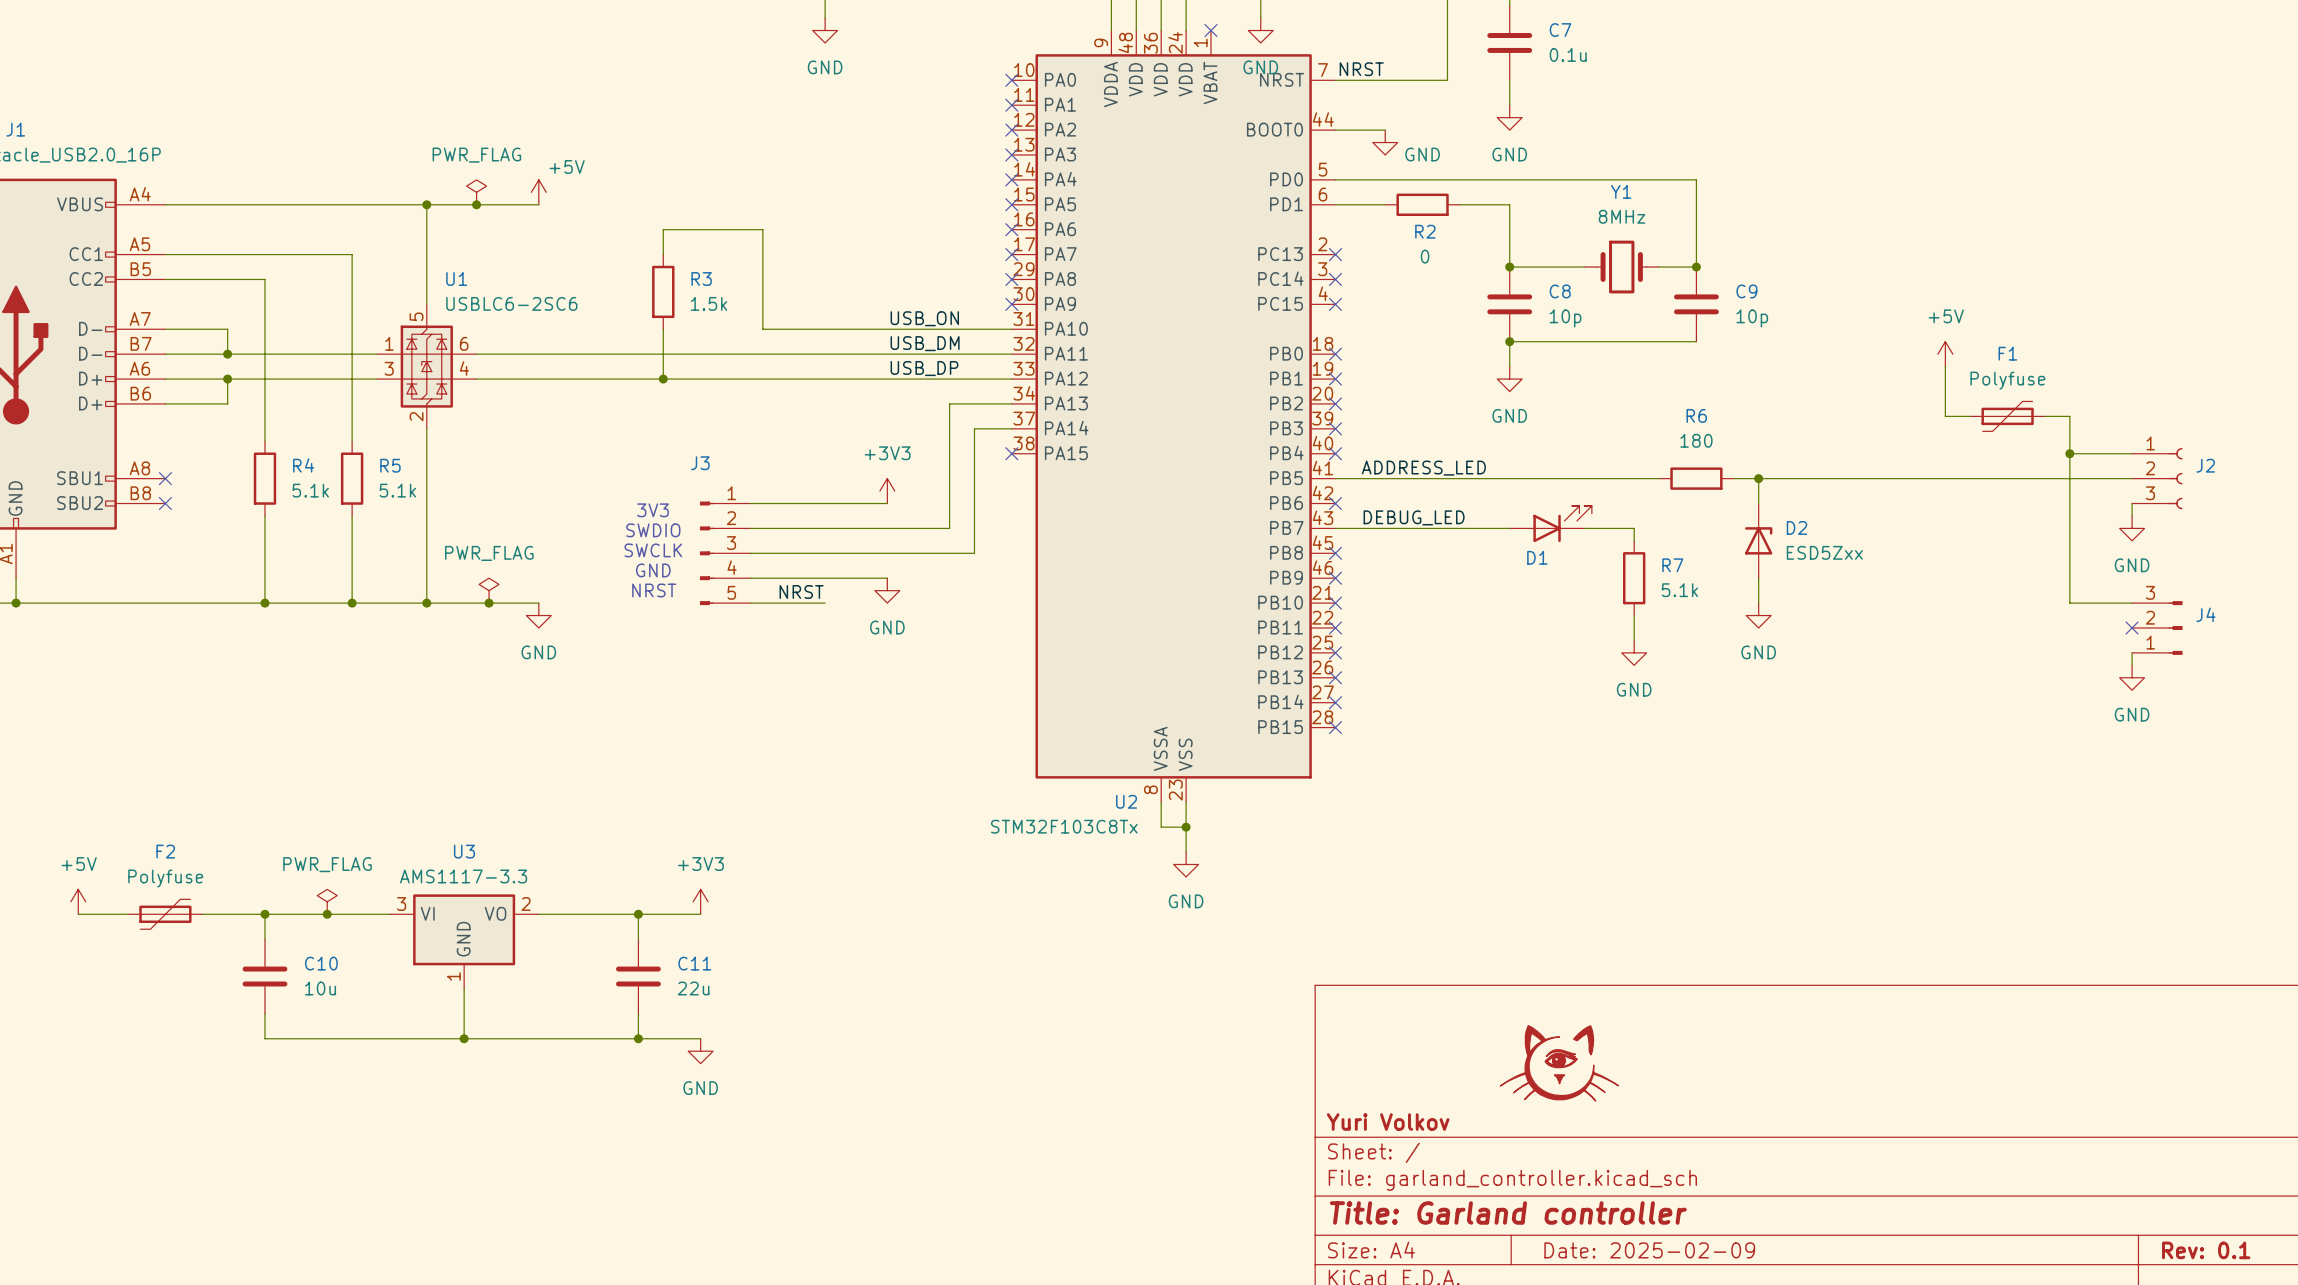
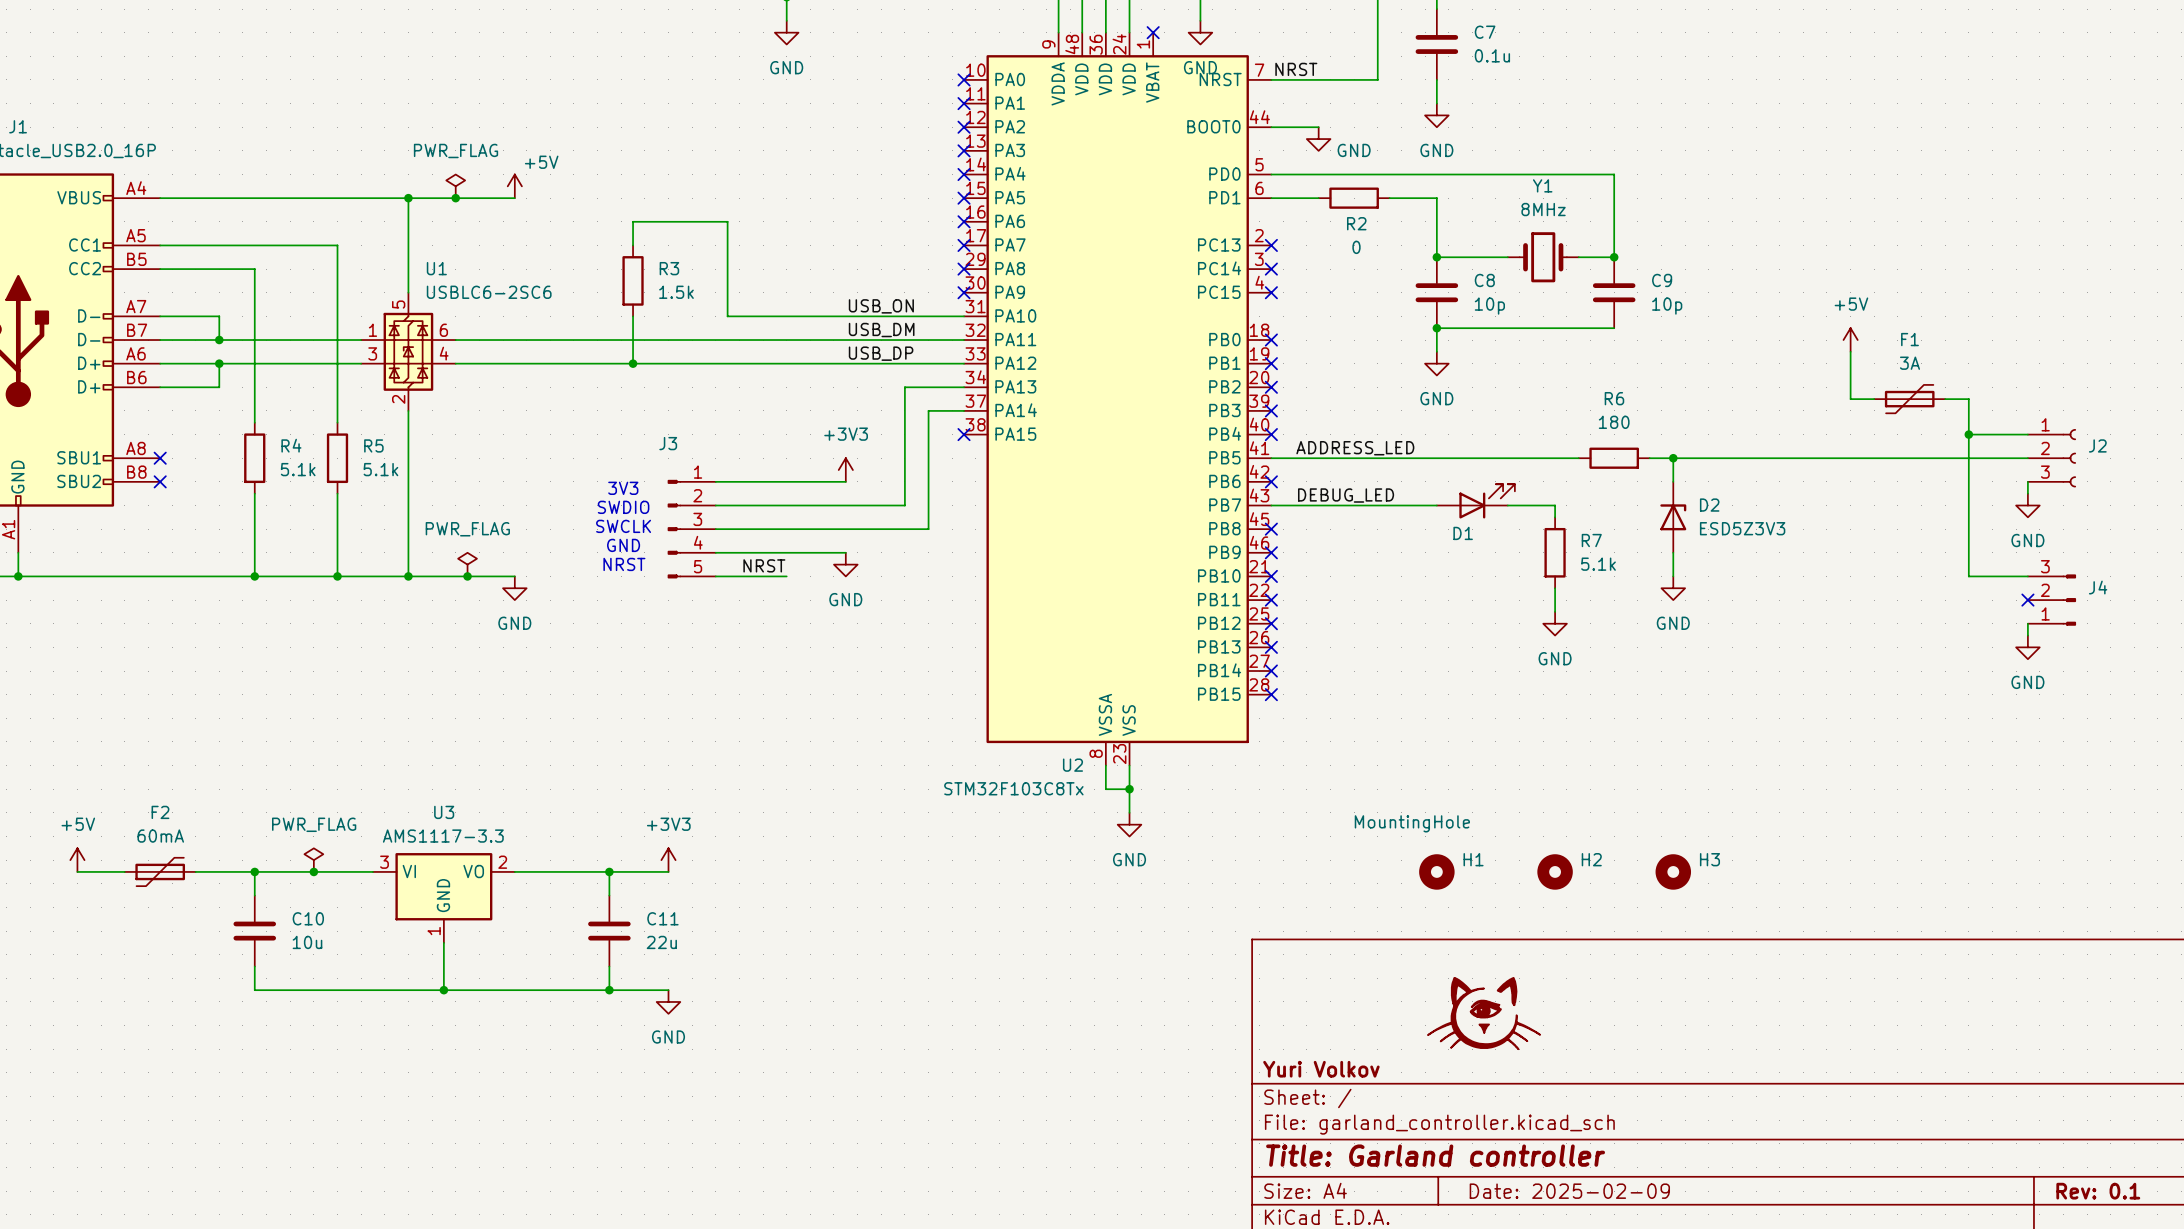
F1 value: Polyfuse (2007, 380) -> 3A (1909, 363)
D2 value: ESD5Zxx (1824, 552) -> ESD5Z3V3 (1742, 528)
F2 value: Polyfuse (165, 878) -> 60mA (160, 836)
H1: none -> MountingHole (1436, 871)
H2: none -> (1555, 871)
H3: none -> (1673, 871)

